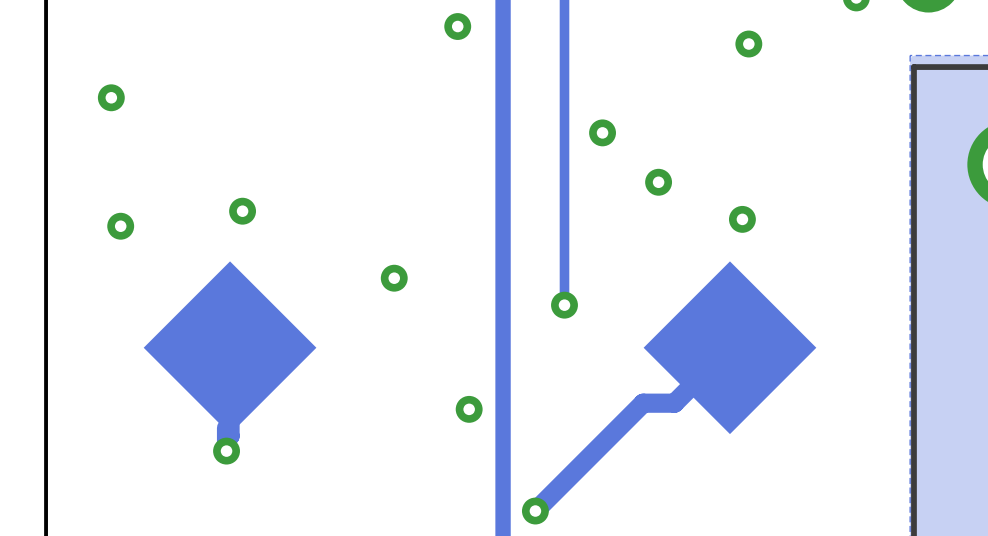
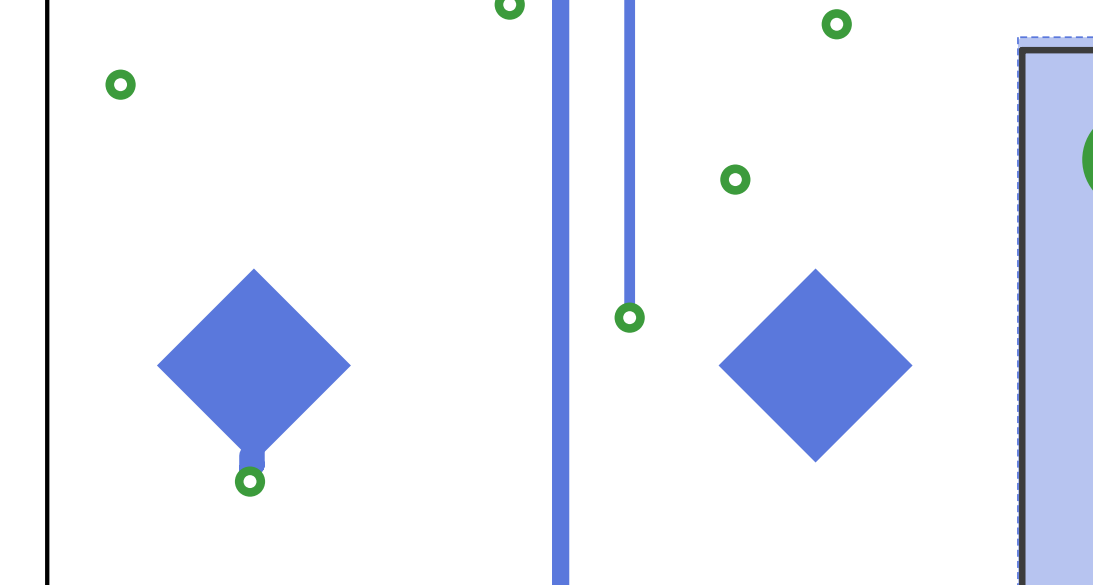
via: (602, 132) -> none
via: (242, 211) -> none
via: (742, 219) -> none
via: (120, 226) -> none
via: (394, 278) -> none
track: (729, 347) (674, 403) (643, 403) (535, 511) -> none
via: (469, 409) -> none
via: (535, 511) -> none

